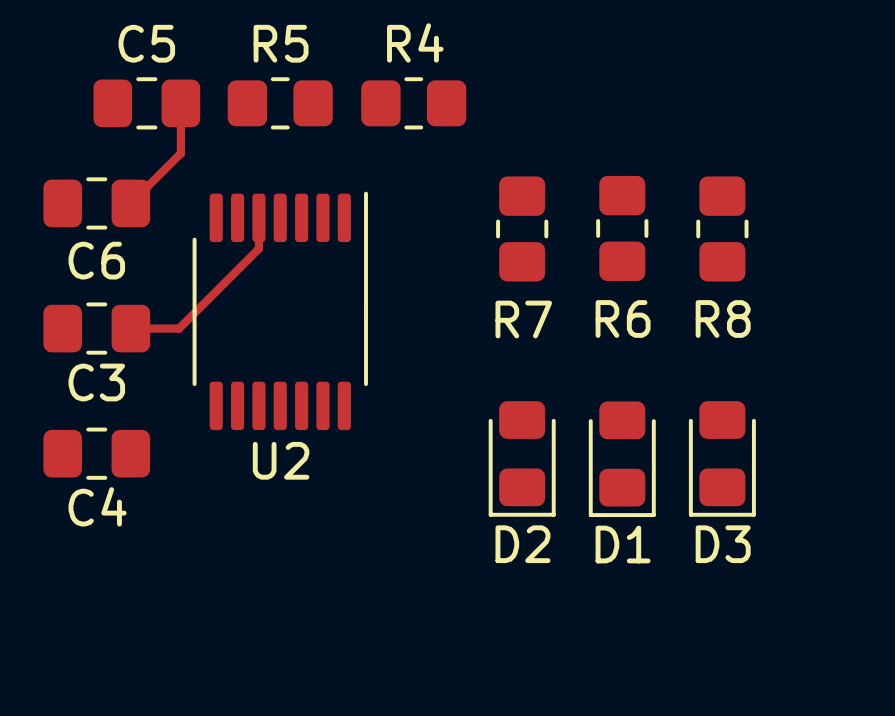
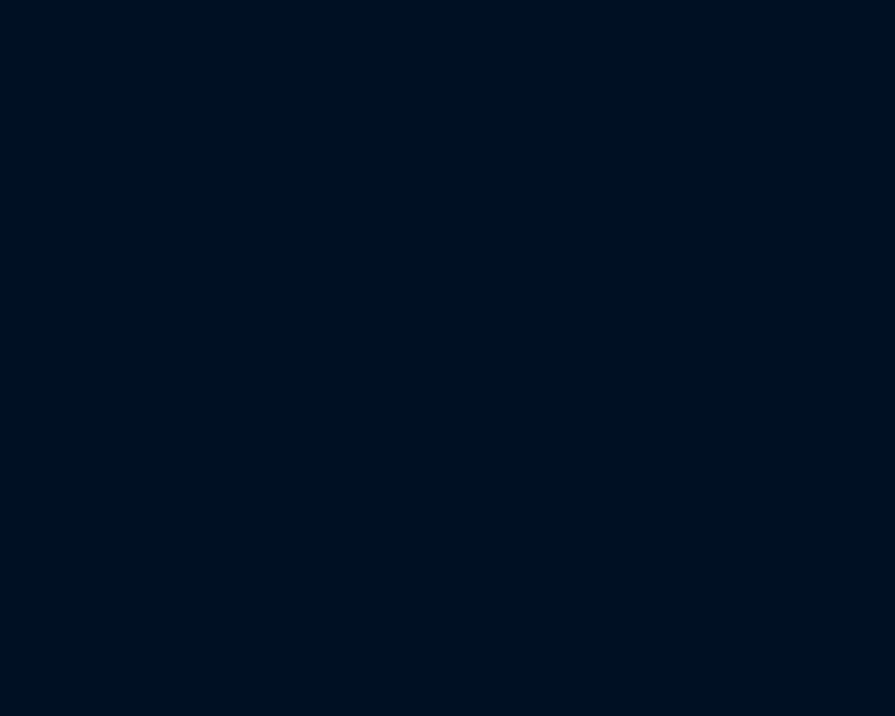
C5: (146, 103) -> none
top track: (180, 103) (180, 153) (130, 203) -> none
R5: (280, 103) -> none
R4: (413, 103) -> none
C6: (96, 203) -> none
top track: (258, 217) (258, 248) (179, 328) (130, 328) -> none
R7: (522, 228) -> none
R6: (622, 228) -> none
R8: (722, 228) -> none
U2: (280, 310) -> none
C3: (96, 328) -> none
C4: (96, 453) -> none
D2: (522, 458) -> none
D3: (722, 458) -> none
D1: (622, 459) -> none

